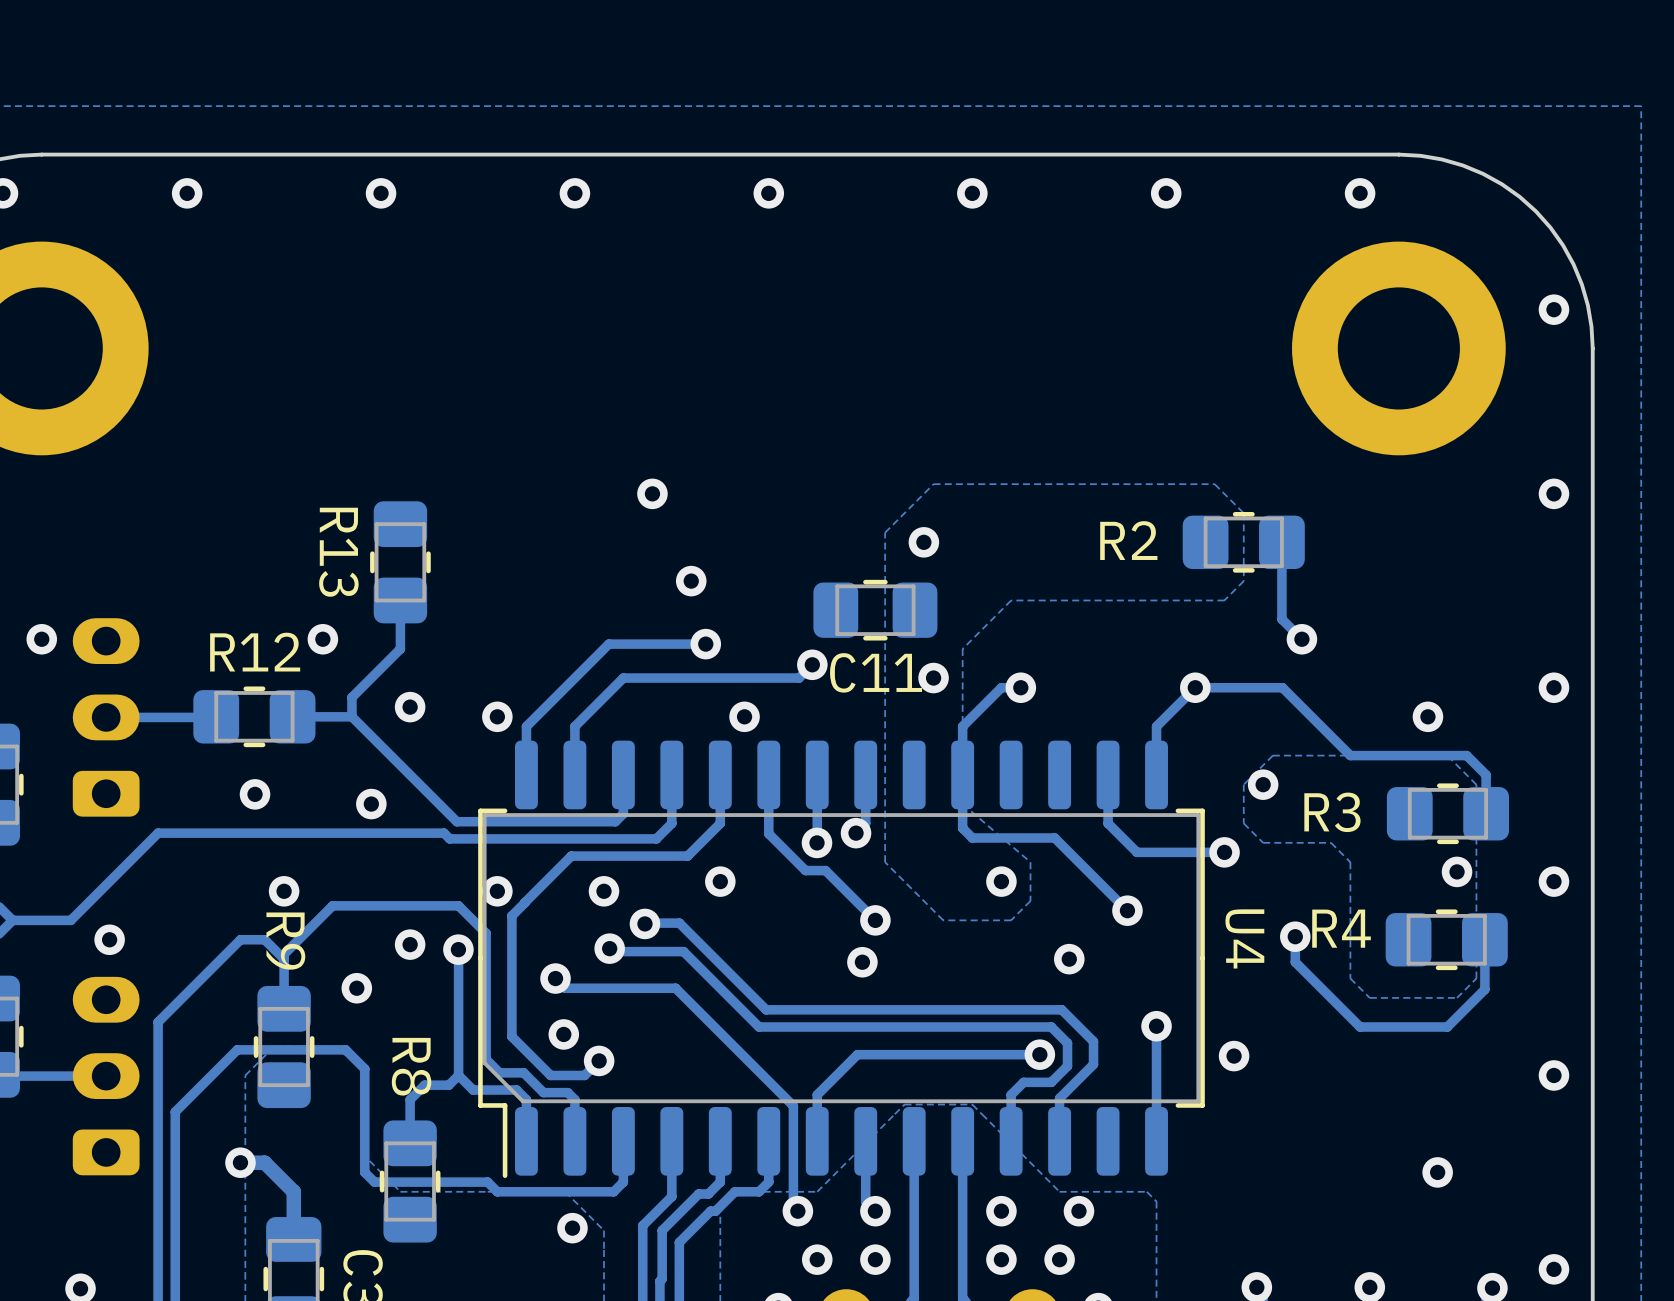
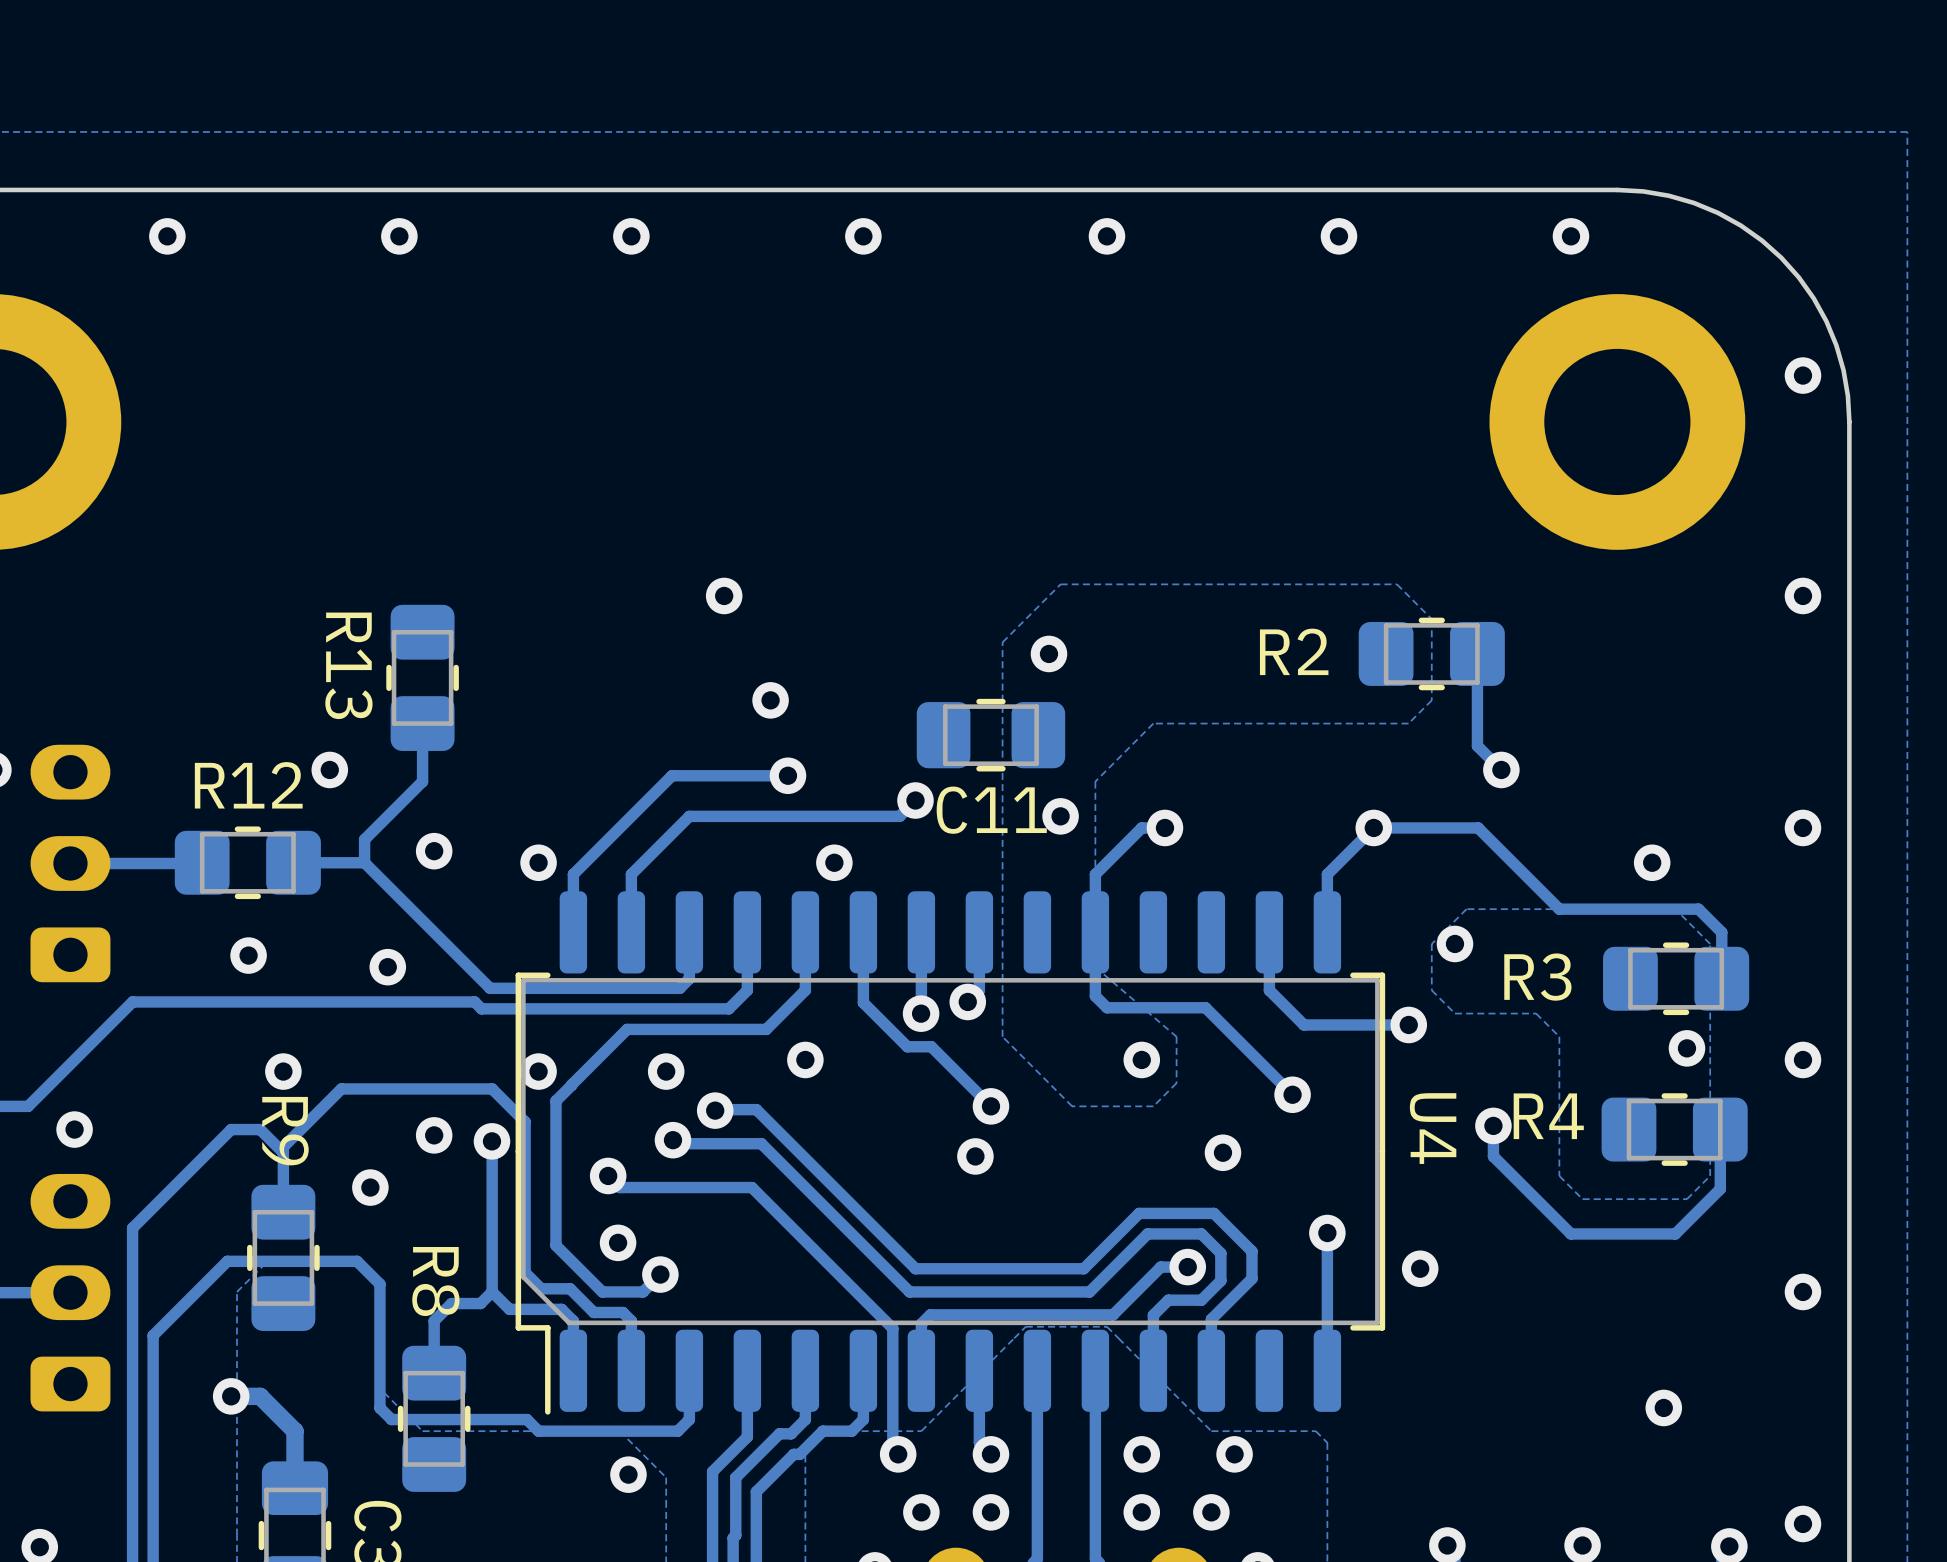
track: (999, 1009) (766, 1009) -> (1139, 1213) (1083, 1268) (915, 1268) (860, 1213)
track: (1006, 1027) (759, 1027) -> (1147, 1233) (1089, 1291) (909, 1291) (851, 1233)
track: (1017, 1054) (857, 1054) (817, 1094) (817, 1102) -> (1160, 1267) (1113, 1314) (930, 1314) (921, 1323)

